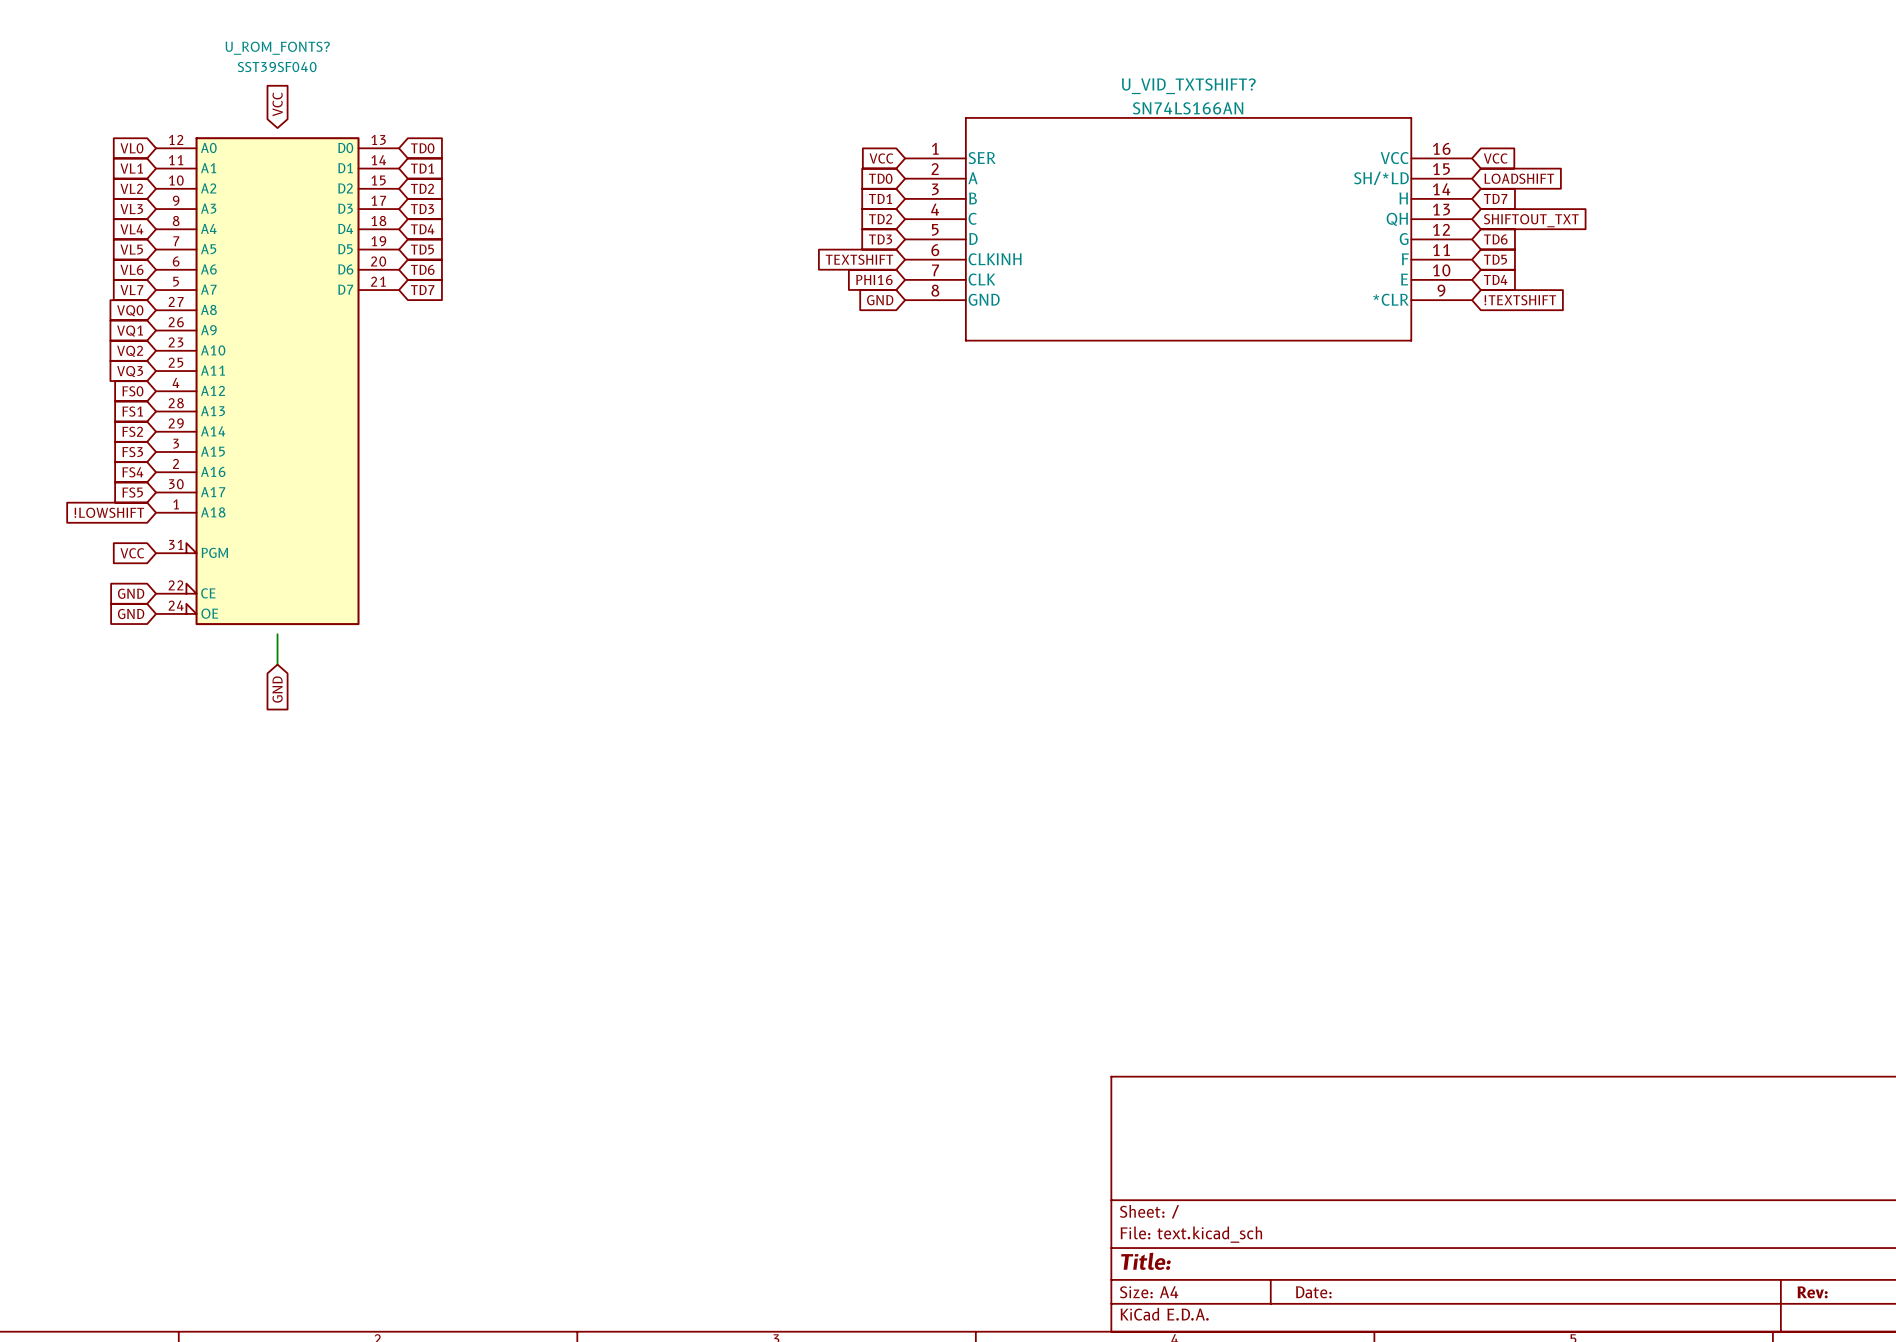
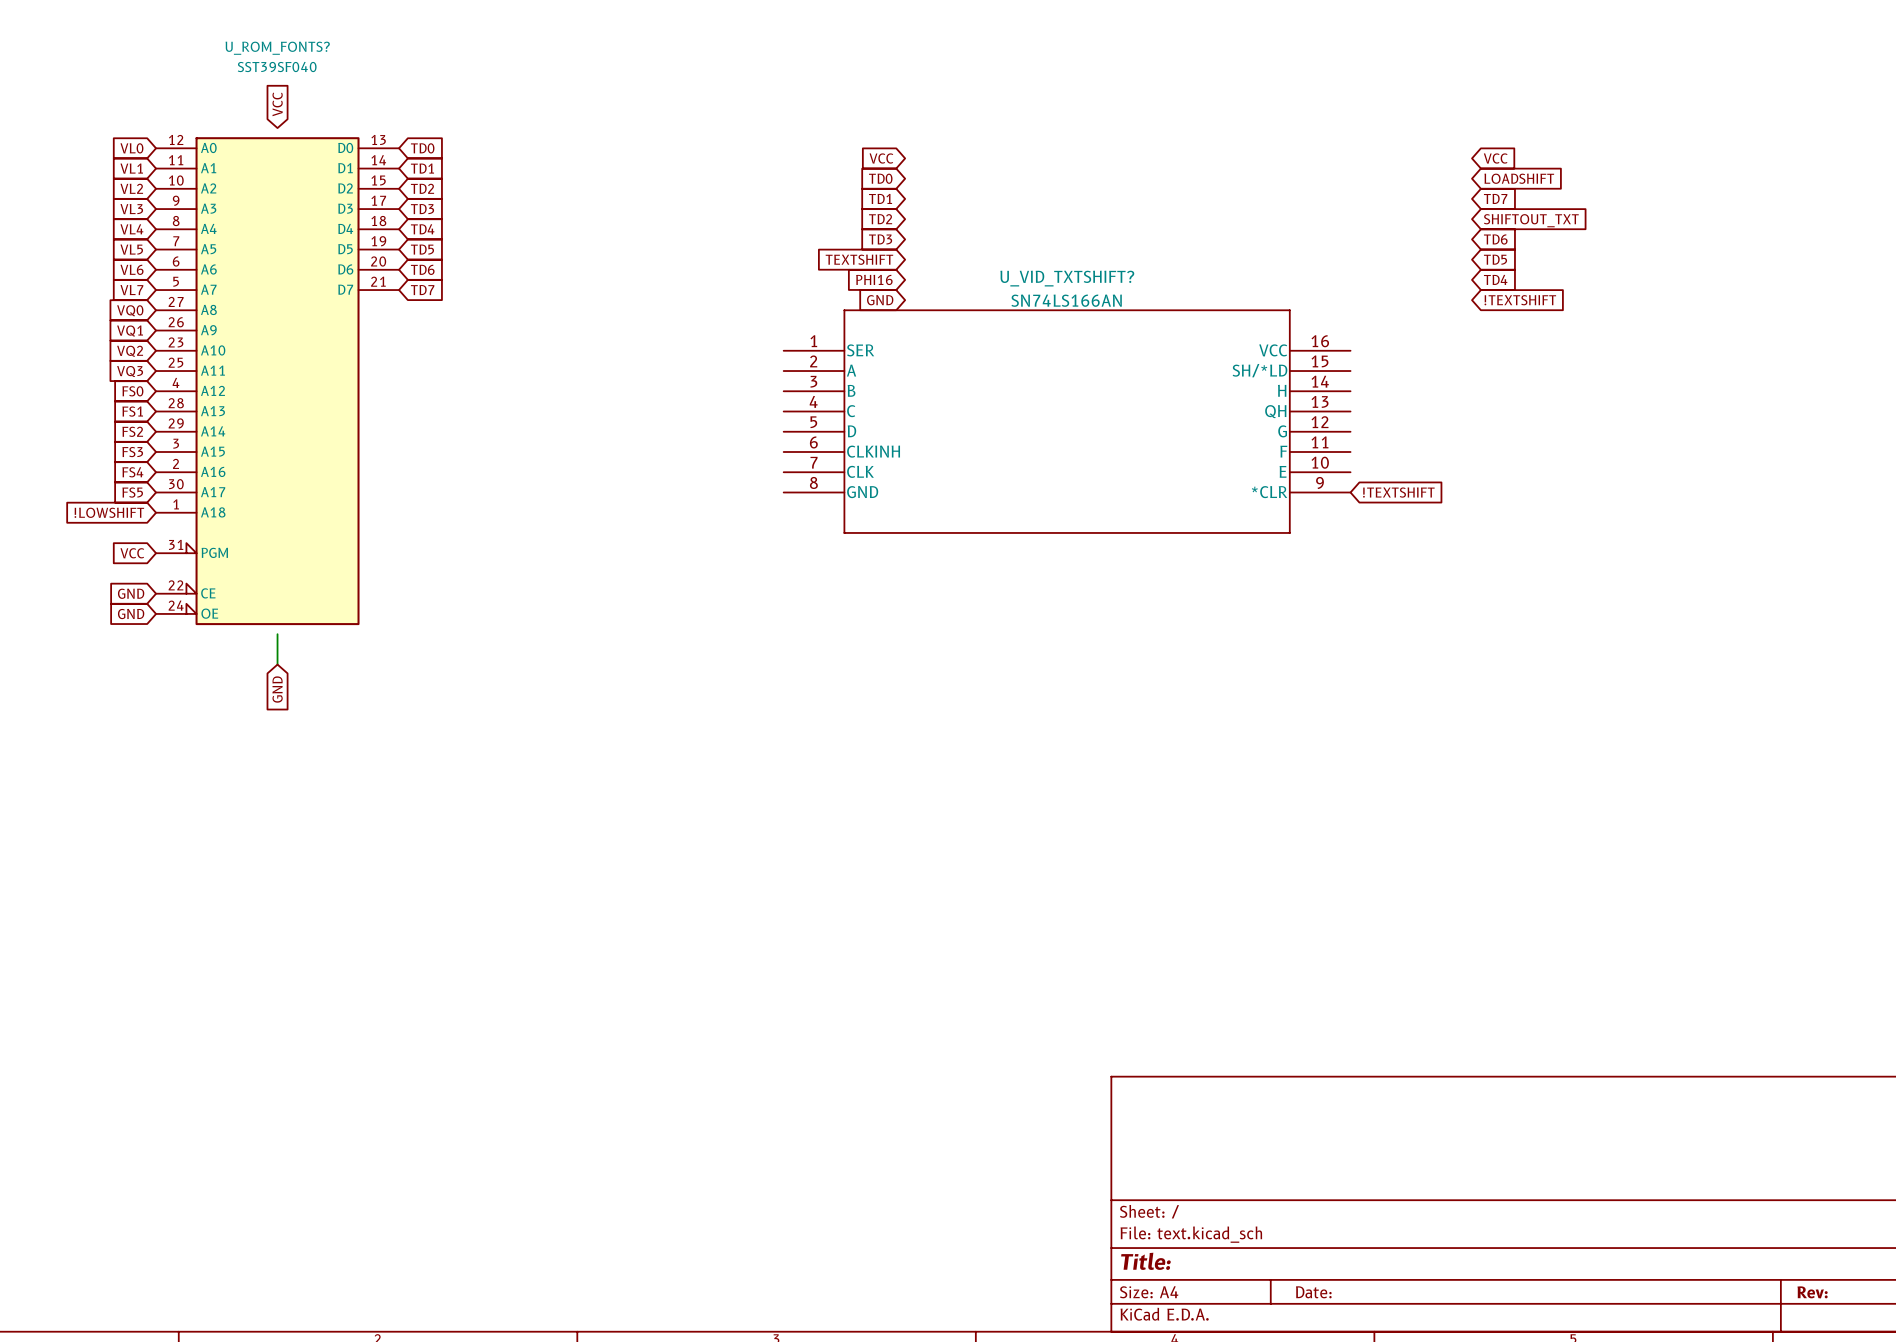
U_VID_TXTSHIFT?: SN74LS166AN (1188, 229) -> none
U_VID_TXTSHIFT?: none -> SN74LS166AN (1067, 421)
global label: none -> !TEXTSHIFT (1398, 492)

